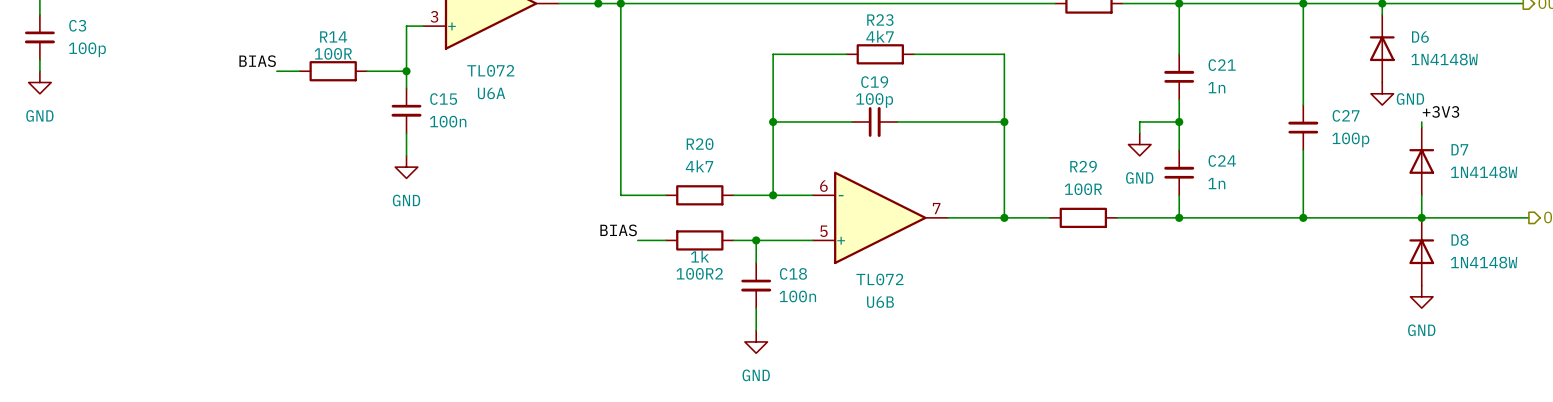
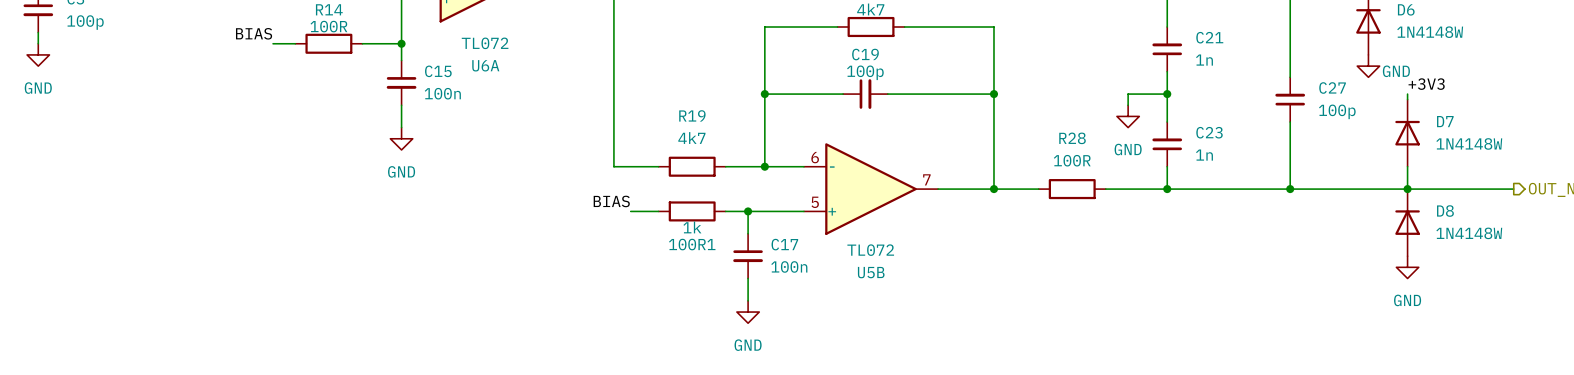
R20 name: R20 (700, 144) -> R19 (692, 115)
C24 name: C24 (1222, 160) -> C23 (1209, 132)
R29 name: R29 (1083, 166) -> R28 (1072, 138)
100R2 name: 100R2 (699, 273) -> 100R1 (692, 244)
C18 name: C18 (793, 273) -> C17 (784, 244)
U6B name: U6B (880, 302) -> U5B (871, 272)

